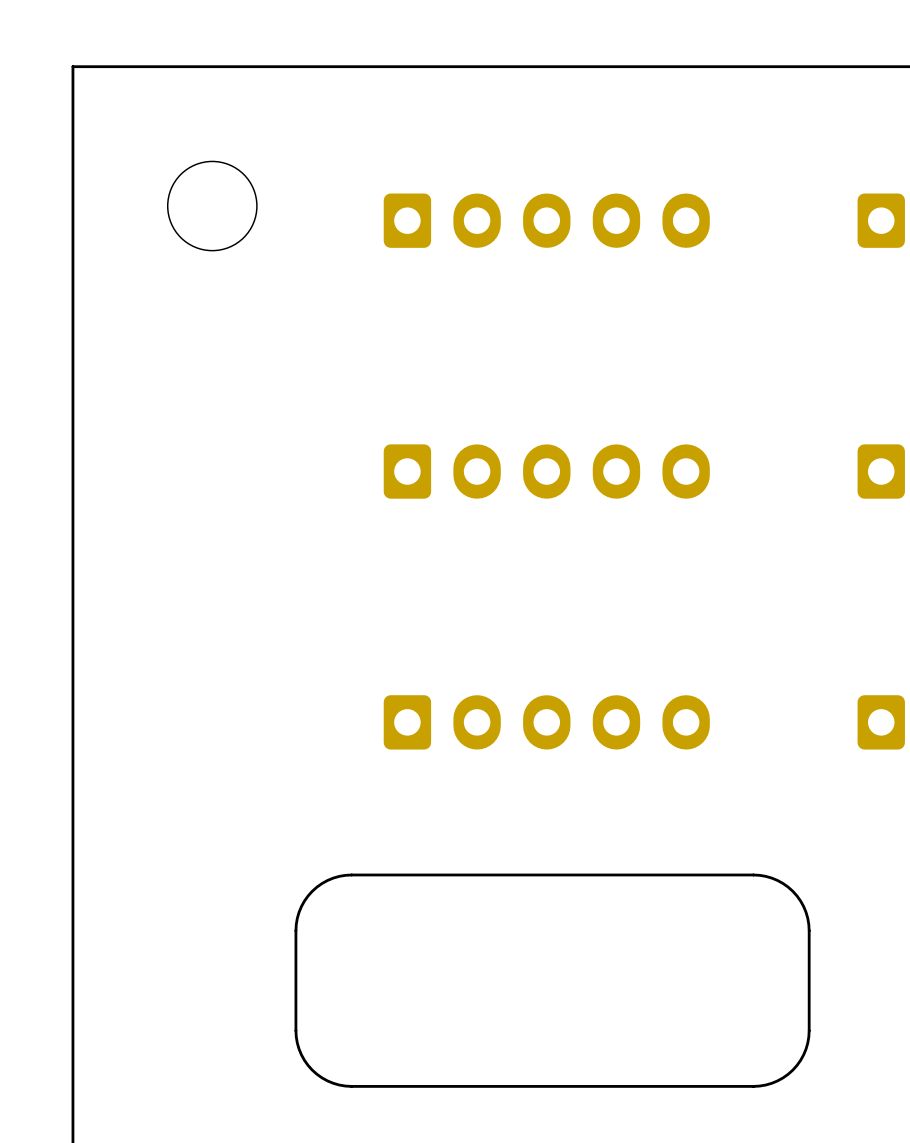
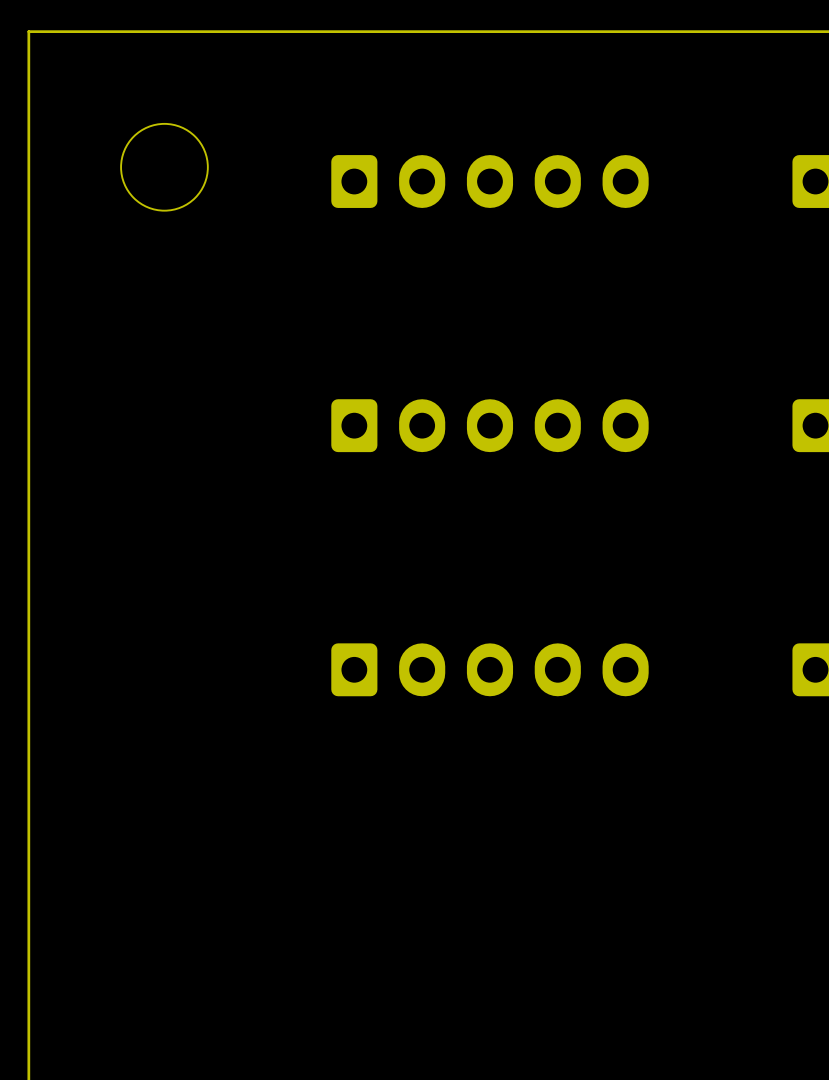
board edge: (753, 874) (351, 874) (333, 878) (322, 883) (308, 895) (297, 918) (295, 1030) (299, 1049) (308, 1065) (316, 1074) (333, 1083) (345, 1086) (753, 1086) (771, 1083) (792, 1070) (800, 1060) (807, 1043) (808, 924) (803, 906) (792, 891) (777, 880) (753, 874) -> none

